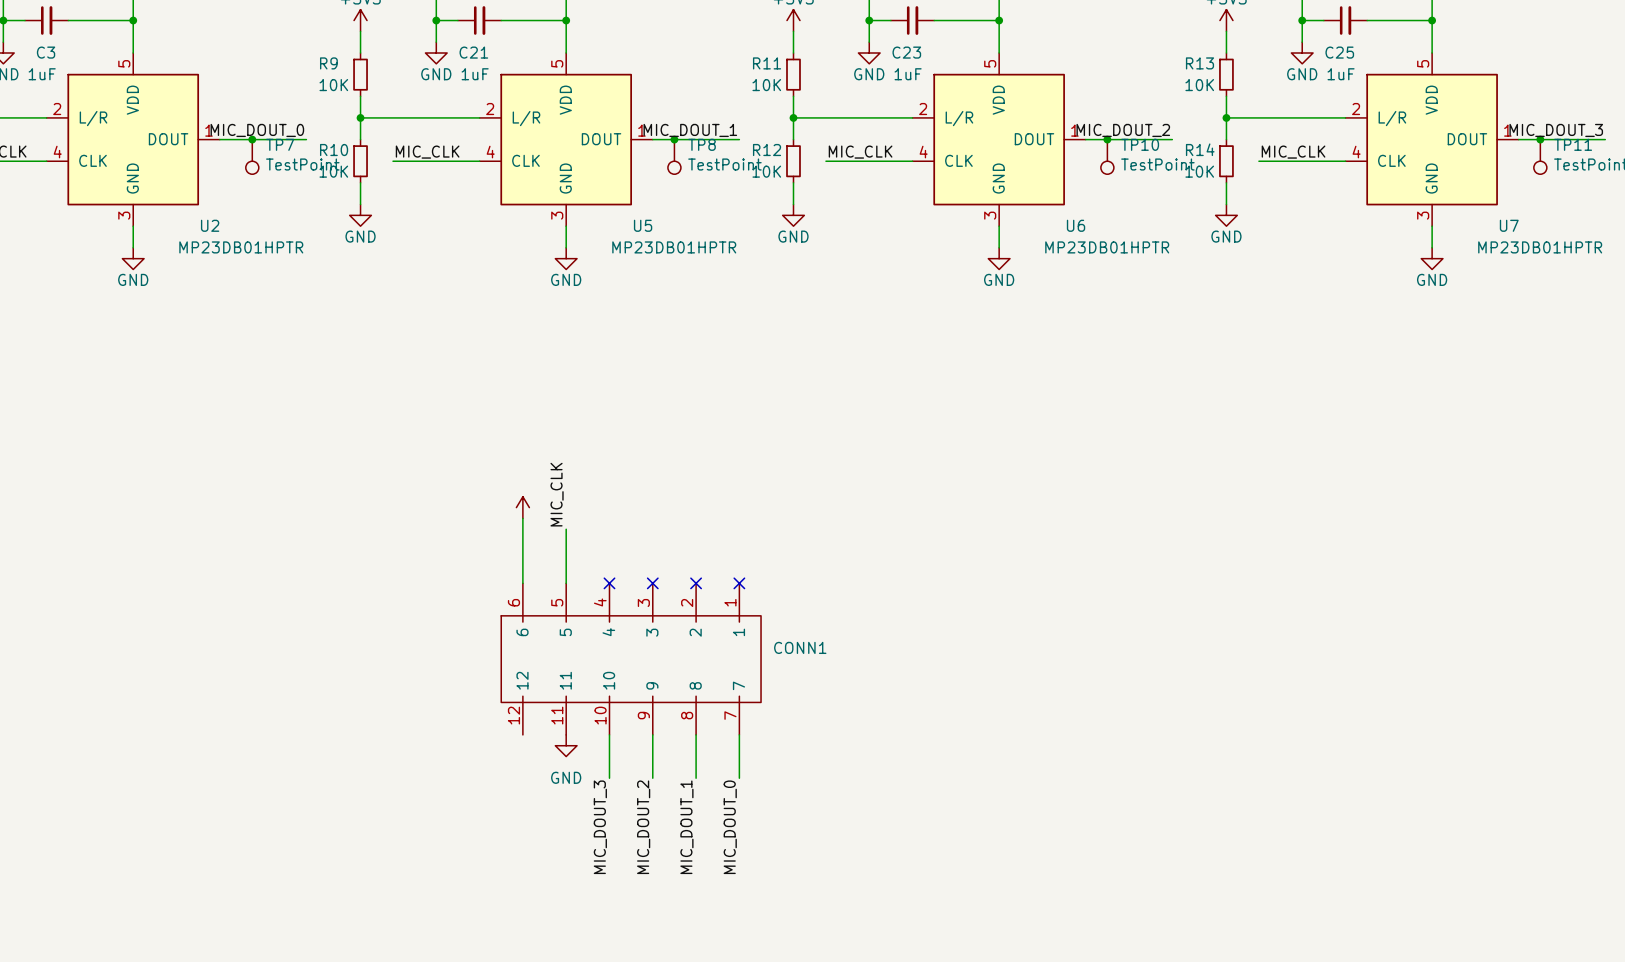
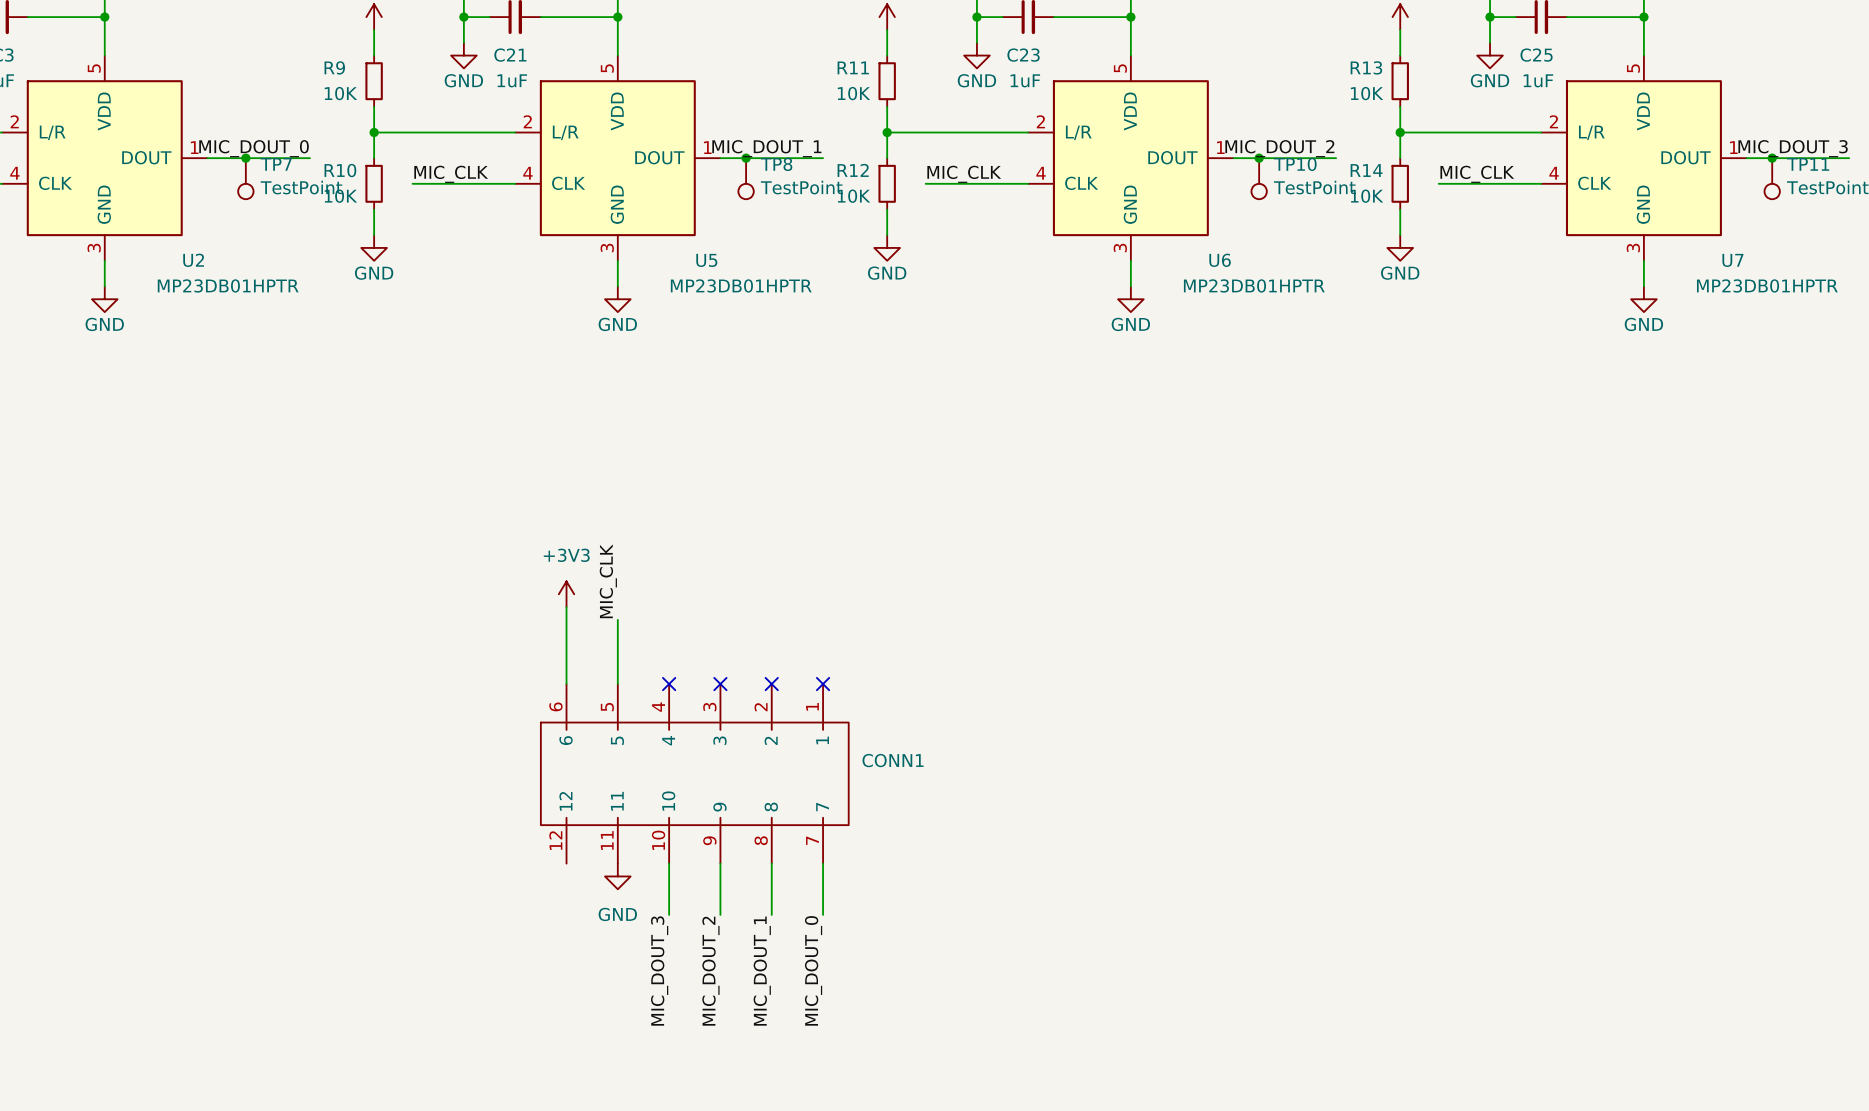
power symbol text: none -> +3V3 (566, 555)

